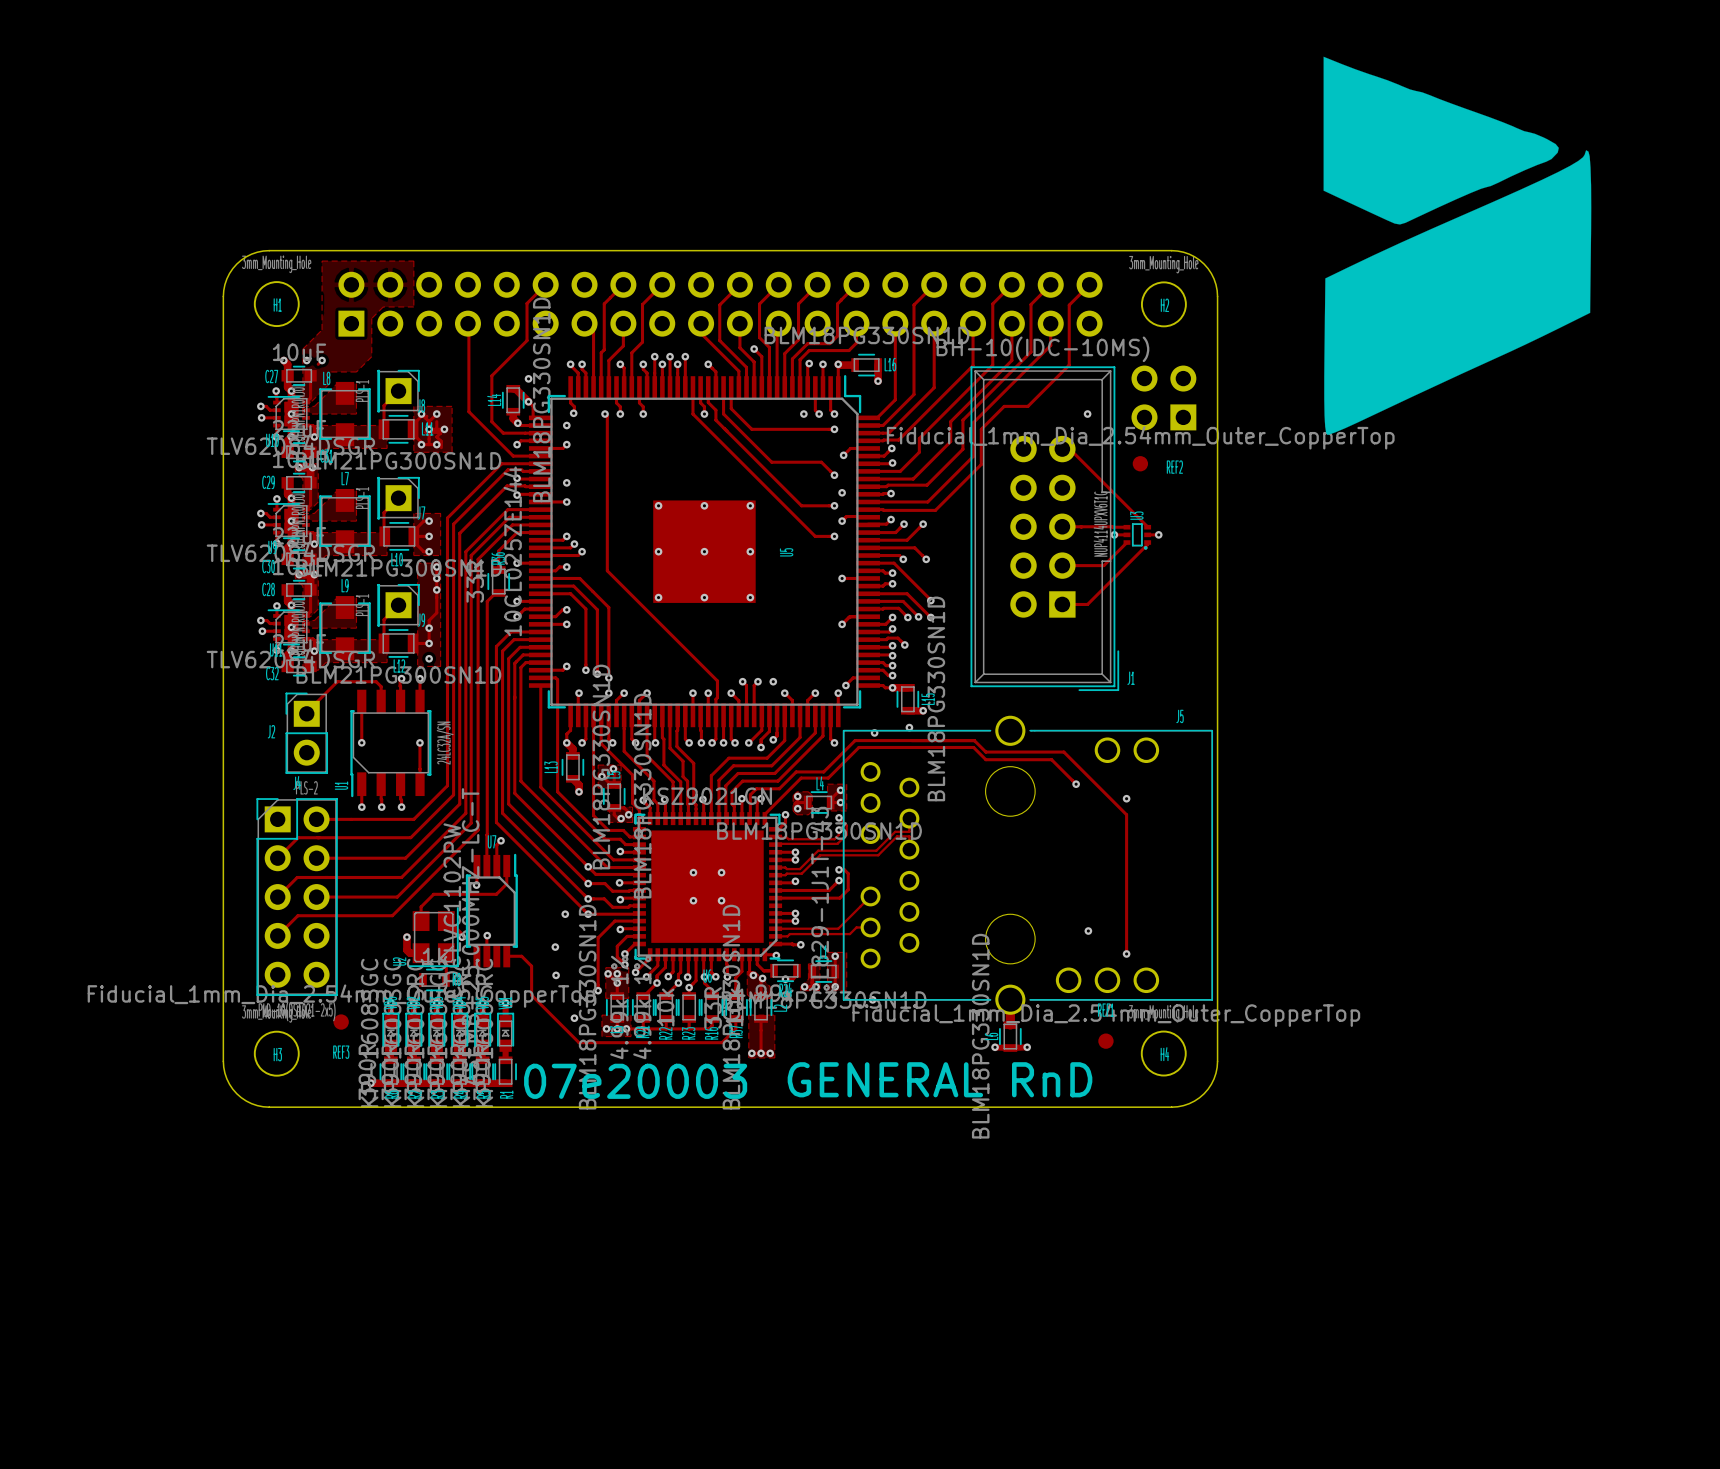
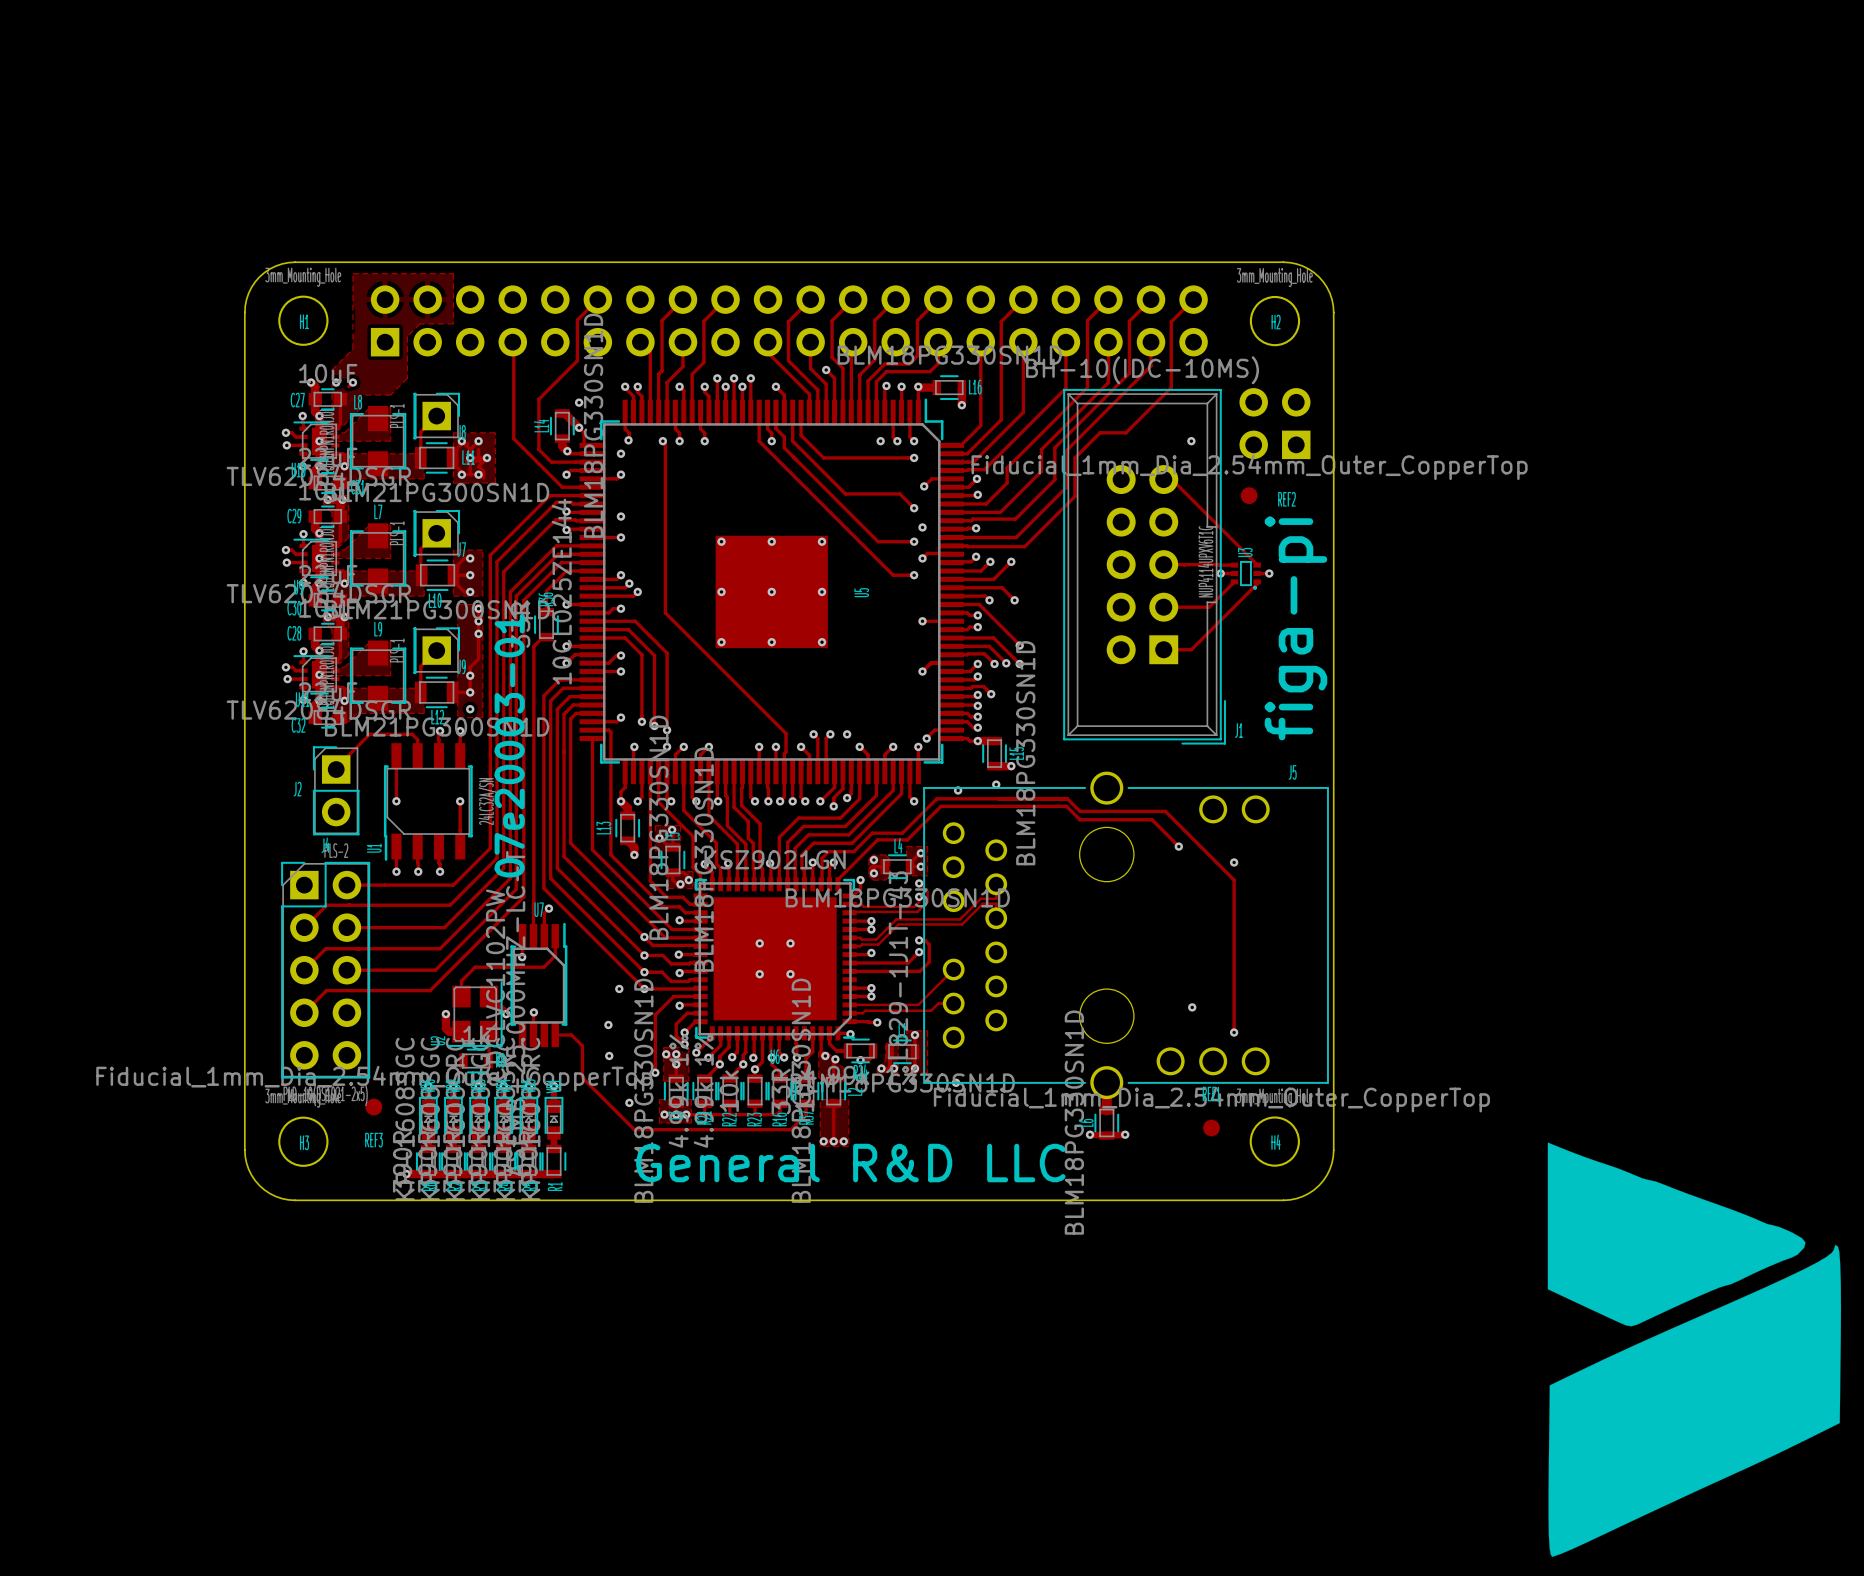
drawing: [1323, 56, 1592, 435] -> none
text: none -> figa-pi (1295, 628)
text: none -> 07e20003-01 (509, 745)
drawing: none -> [1547, 1142, 1842, 1557]
text: none -> General R&D LLC (850, 1163)
text: GENERAL RnD (940, 1079) -> none
text: 07e20003 (635, 1081) -> none

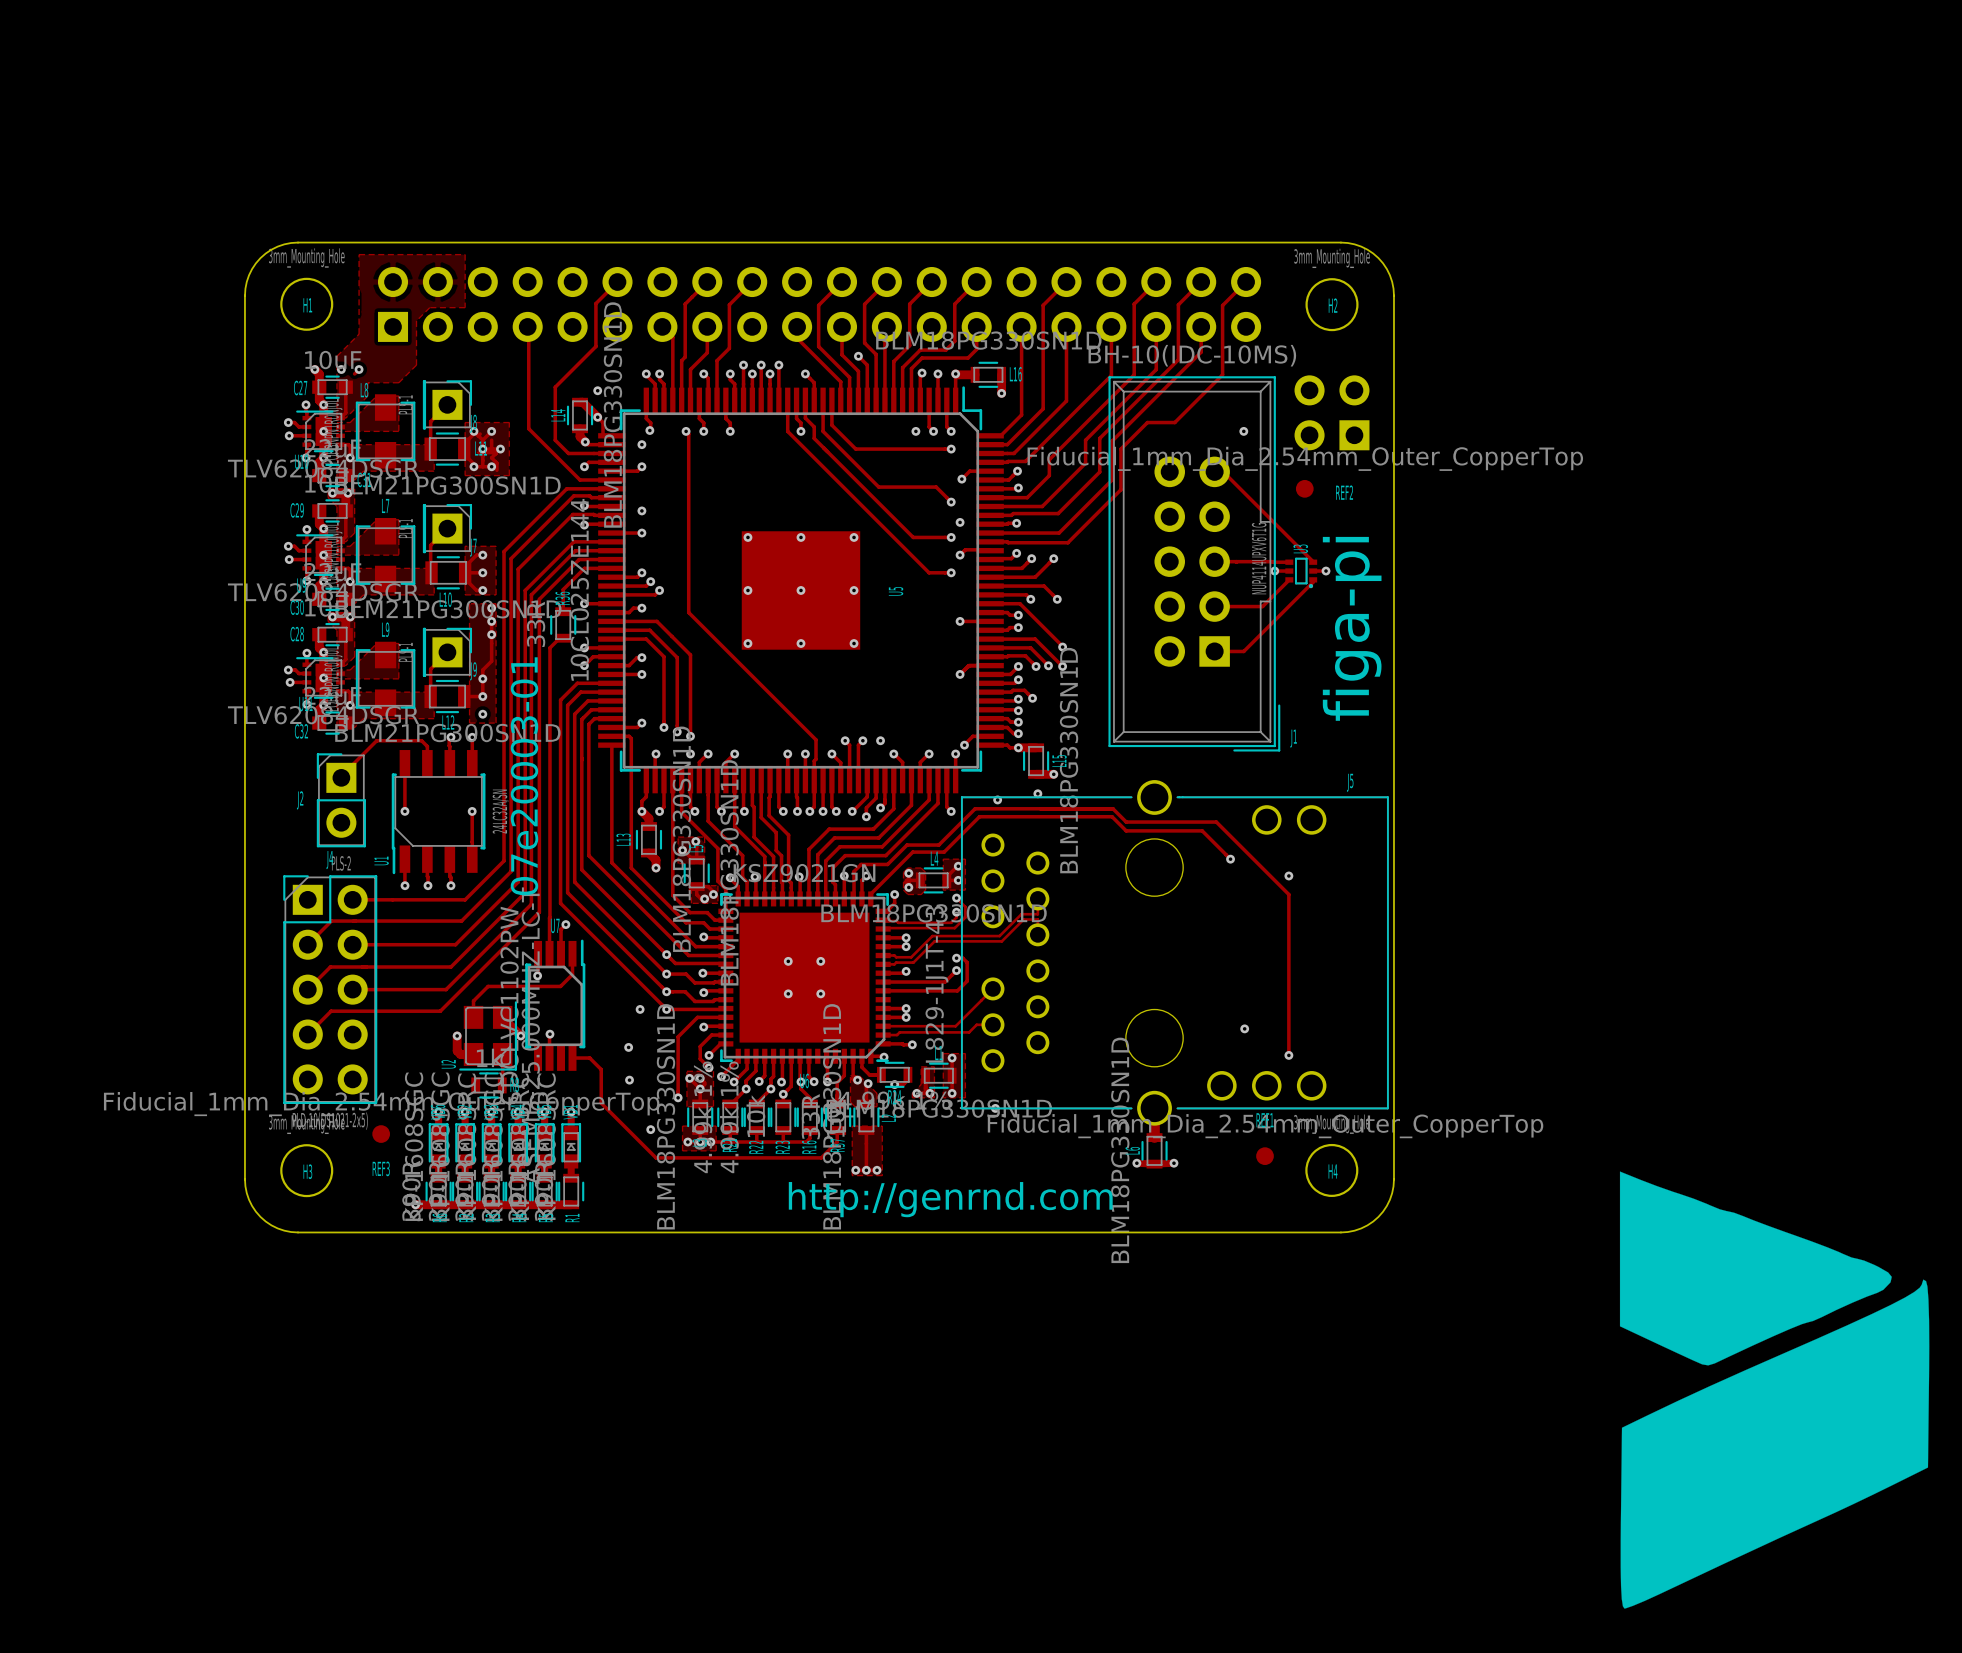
text: General R&D LLC (850, 1163) -> none
text: none -> http://genrnd.com (950, 1199)

